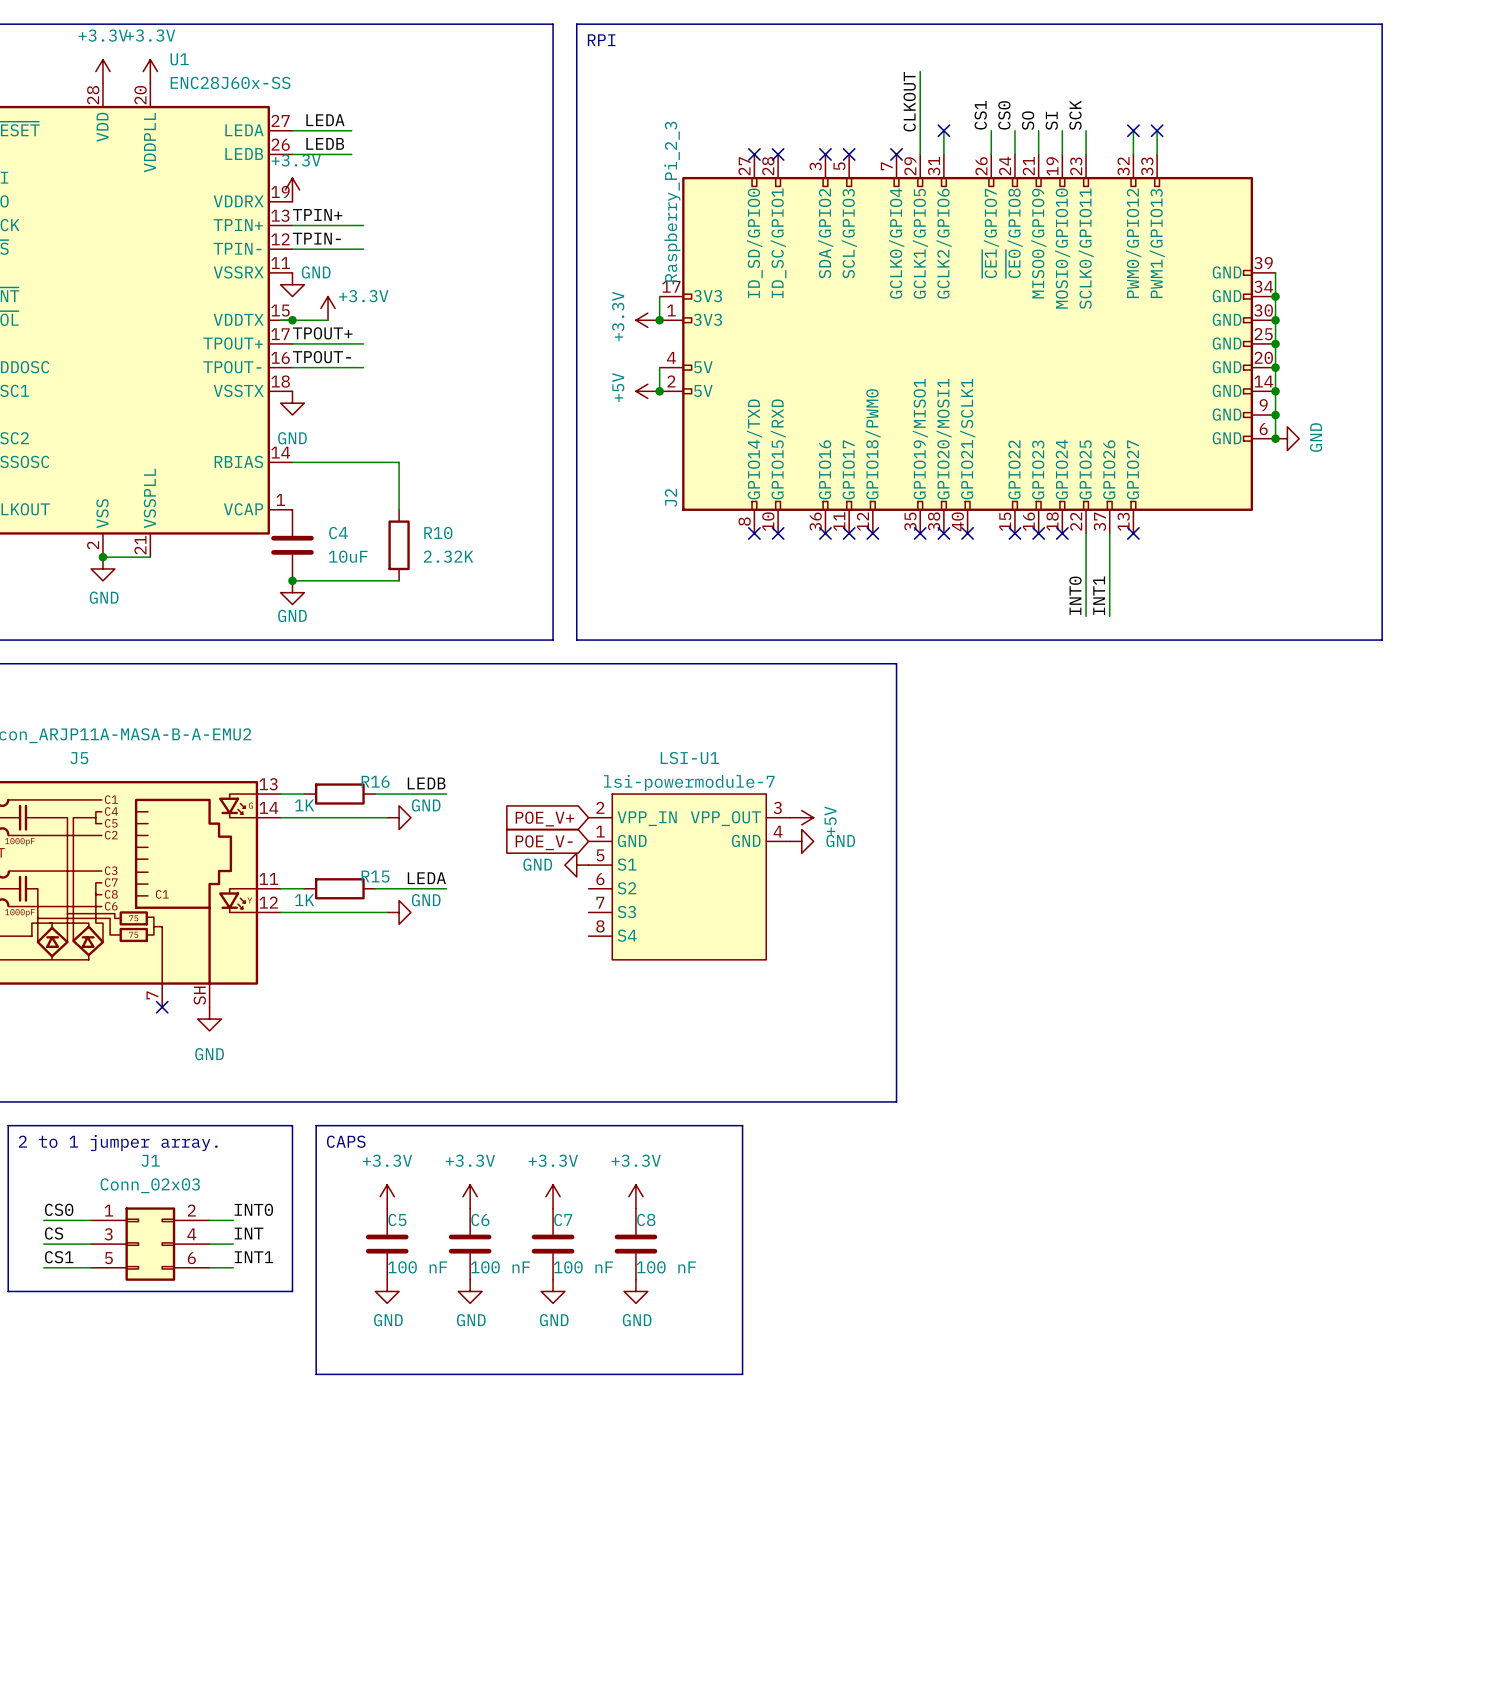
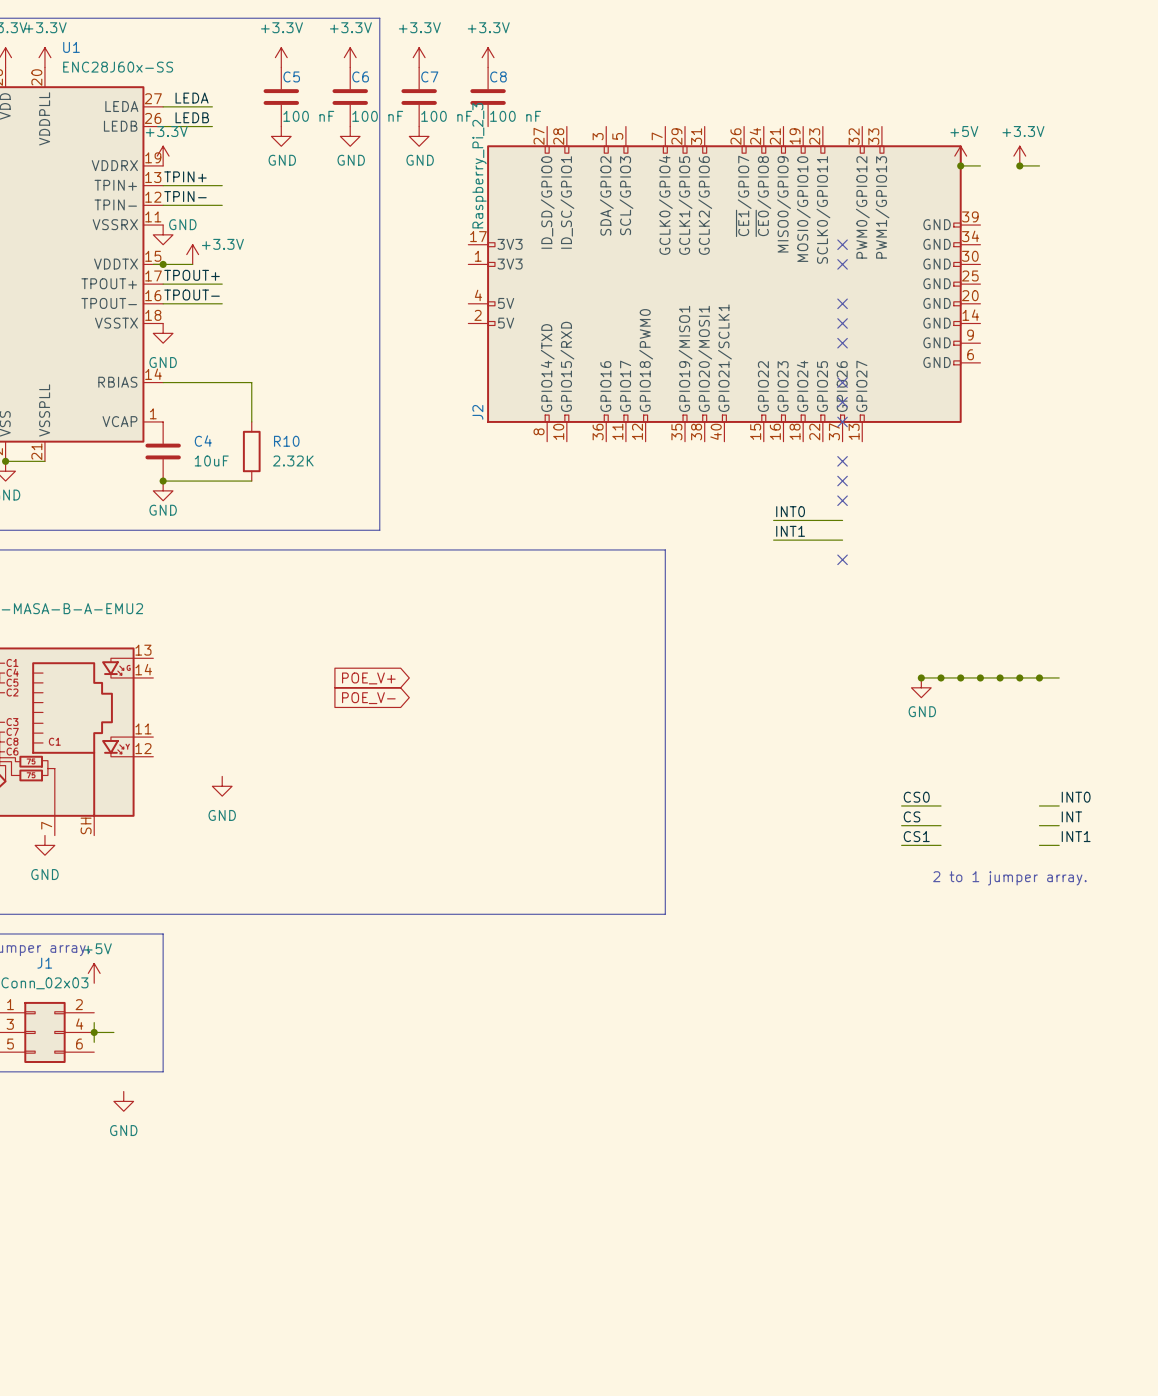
line: (576, 24) (1382, 24) (1382, 640) (576, 640) (576, 24) -> none
text: RPI (601, 40) -> none
power symbol: none -> +3.3V (281, 57)
power symbol: none -> +3.3V (350, 57)
power symbol: none -> +3.3V (419, 57)
power symbol: none -> +3.3V (488, 57)
wire: (920, 71) (920, 154) -> none
label: CLKOUT (909, 101) -> none
label: CS1 (980, 115) -> none
label: CS0 (1004, 115) -> none
label: SCK (1075, 115) -> none
label: SO (1028, 120) -> none
label: SI (1051, 120) -> none
wire: (943, 130) (943, 154) -> none
no-connect mark: (943, 130) -> none
wire: (991, 130) (991, 154) -> none
wire: (1014, 130) (1014, 154) -> none
wire: (1038, 130) (1038, 154) -> none
wire: (1062, 130) (1062, 154) -> none
wire: (1086, 130) (1086, 154) -> none
wire: (1133, 130) (1133, 154) -> none
no-connect mark: (1133, 130) -> none
wire: (1157, 130) (1157, 154) -> none
no-connect mark: (1157, 130) -> none
no-connect mark: (754, 154) -> none
no-connect mark: (778, 154) -> none
no-connect mark: (825, 154) -> none
no-connect mark: (849, 154) -> none
no-connect mark: (896, 154) -> none
power symbol: none -> GND (281, 136)
power symbol: none -> GND (350, 136)
power symbol: none -> GND (419, 136)
power symbol: none -> +5V (960, 156)
power symbol: none -> +3.3V (1019, 156)
wire: none -> (960, 165) (980, 165)
junction: none -> (960, 165)
wire: none -> (1019, 165) (1039, 165)
junction: none -> (1019, 165)
wire: (1275, 272) (1275, 438) -> none
wire: (659, 296) (659, 320) -> none
no-connect mark: none -> (842, 244)
junction: (1275, 296) -> none
power symbol: +3.3V (647, 320) -> none
junction: (659, 320) -> none
no-connect mark: none -> (842, 264)
junction: (1275, 320) -> none
junction: (1275, 343) -> none
wire: (659, 367) (659, 391) -> none
no-connect mark: none -> (842, 303)
junction: (1275, 367) -> none
power symbol: +5V (647, 391) -> none
junction: (659, 391) -> none
no-connect mark: none -> (842, 323)
junction: (1275, 391) -> none
no-connect mark: none -> (842, 343)
junction: (1275, 415) -> none
junction: (1275, 438) -> none
power symbol: GND (1287, 438) -> none
no-connect mark: none -> (842, 382)
no-connect mark: none -> (842, 402)
no-connect mark: none -> (842, 421)
no-connect mark: (754, 533) -> none
no-connect mark: (778, 533) -> none
no-connect mark: (825, 533) -> none
no-connect mark: (849, 533) -> none
no-connect mark: (872, 533) -> none
no-connect mark: (920, 533) -> none
no-connect mark: (943, 533) -> none
no-connect mark: (967, 533) -> none
no-connect mark: (1014, 533) -> none
no-connect mark: (1038, 533) -> none
no-connect mark: (1062, 533) -> none
wire: (1086, 533) (1086, 616) -> none
wire: (1109, 533) (1109, 616) -> none
no-connect mark: (1133, 533) -> none
no-connect mark: none -> (842, 461)
no-connect mark: none -> (842, 481)
label rotation: 0° (1075, 595) -> 90° clockwise (790, 511)
label rotation: 0° (1099, 595) -> 90° clockwise (790, 531)
label position: INT1 (1099, 595) -> INT1 (790, 531)
no-connect mark: none -> (842, 500)
wire: none -> (773, 520) (842, 520)
wire: none -> (773, 540) (842, 540)
no-connect mark: none -> (842, 559)
label: LEDB (426, 783) -> none
wire: (280, 794) (304, 794) -> none
R16: 1K (339, 794) -> none
wire: (375, 794) (446, 794) -> none
wire: (280, 817) (387, 817) -> none
power symbol: GND (399, 817) -> none
power symbol: +5V (801, 817) -> none
wire: none -> (921, 677) (1059, 677)
junction: none -> (921, 677)
junction: none -> (941, 677)
junction: none -> (960, 677)
junction: none -> (980, 677)
junction: none -> (1000, 677)
junction: none -> (1019, 677)
junction: none -> (1039, 677)
power symbol: none -> GND (921, 687)
power symbol: GND (801, 841) -> none
power symbol: GND (576, 865) -> none
LSI-U1: lsi-powermodule-7 (689, 876) -> none
label: LEDA (426, 878) -> none
wire: (280, 888) (304, 888) -> none
R15: 1K (339, 888) -> none
wire: (375, 888) (446, 888) -> none
wire: (280, 912) (387, 912) -> none
power symbol rotation: 0° (399, 912) -> 90° clockwise (222, 786)
power symbol position: GND (399, 912) -> GND (222, 786)
label: none -> CS0 (916, 797)
label: none -> INT0 (1076, 797)
wire: none -> (901, 805) (941, 805)
wire: none -> (1039, 805) (1059, 805)
label: none -> CS (912, 816)
label: none -> INT (1071, 816)
wire: none -> (901, 825) (941, 825)
wire: none -> (1039, 825) (1059, 825)
no-connect mark: (162, 1007) -> none
label: none -> CS1 (916, 836)
label: none -> INT1 (1076, 836)
power symbol position: GND (209, 1019) -> GND (44, 845)
wire: none -> (901, 845) (941, 845)
wire: none -> (1039, 845) (1059, 845)
text: none -> 2 to 1 jumper array. (1009, 878)
line: (316, 1125) (742, 1125) (742, 1374) (316, 1374) (316, 1125) -> none
text: CAPS (346, 1141) -> none
power symbol: none -> +5V (94, 973)
power symbol: +3.3V (387, 1196) -> none
power symbol: +3.3V (470, 1196) -> none
power symbol: +3.3V (553, 1196) -> none
power symbol: +3.3V (635, 1196) -> none
label: INT0 (253, 1209) -> none
wire: (209, 1220) (233, 1220) -> none
wire: none -> (94, 1022) (94, 1042)
label: INT (249, 1233) -> none
junction: none -> (94, 1032)
C5 position: (387, 1244) -> (281, 97)
C6 position: (470, 1244) -> (350, 97)
C7 position: (553, 1244) -> (419, 97)
C8 position: (635, 1244) -> (488, 97)
label: INT1 (253, 1257) -> none
wire: (209, 1267) (233, 1267) -> none
power symbol: GND (387, 1291) -> none
power symbol: GND (470, 1291) -> none
power symbol: GND (553, 1291) -> none
power symbol: GND (635, 1291) -> none
power symbol: none -> GND (123, 1101)

